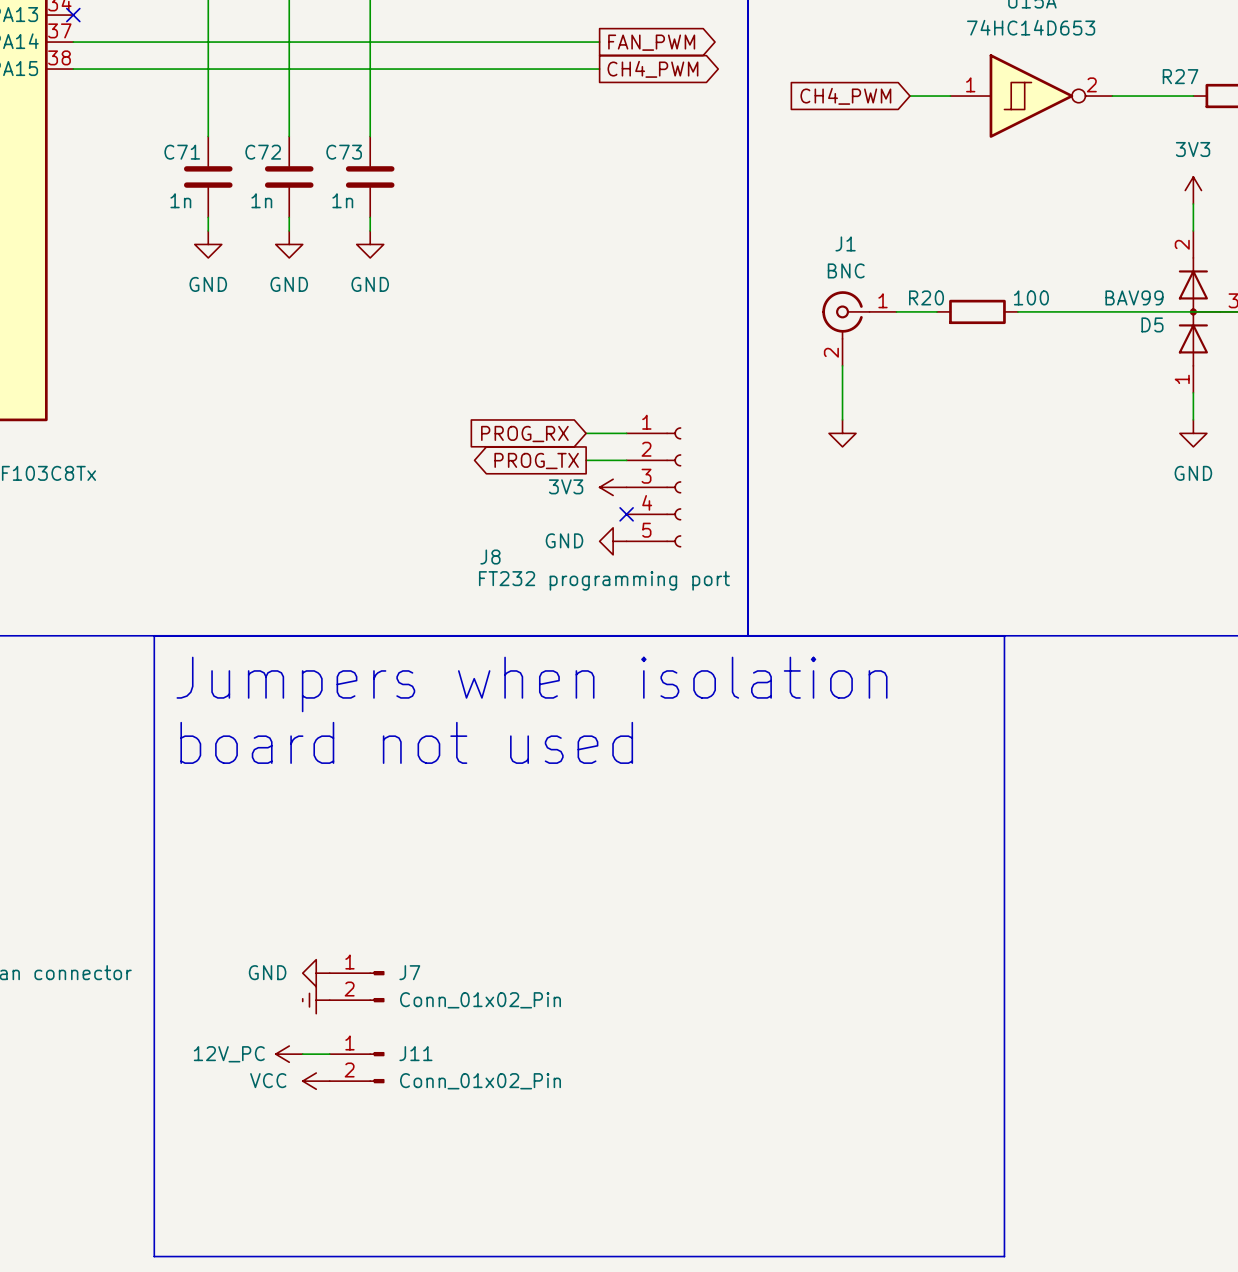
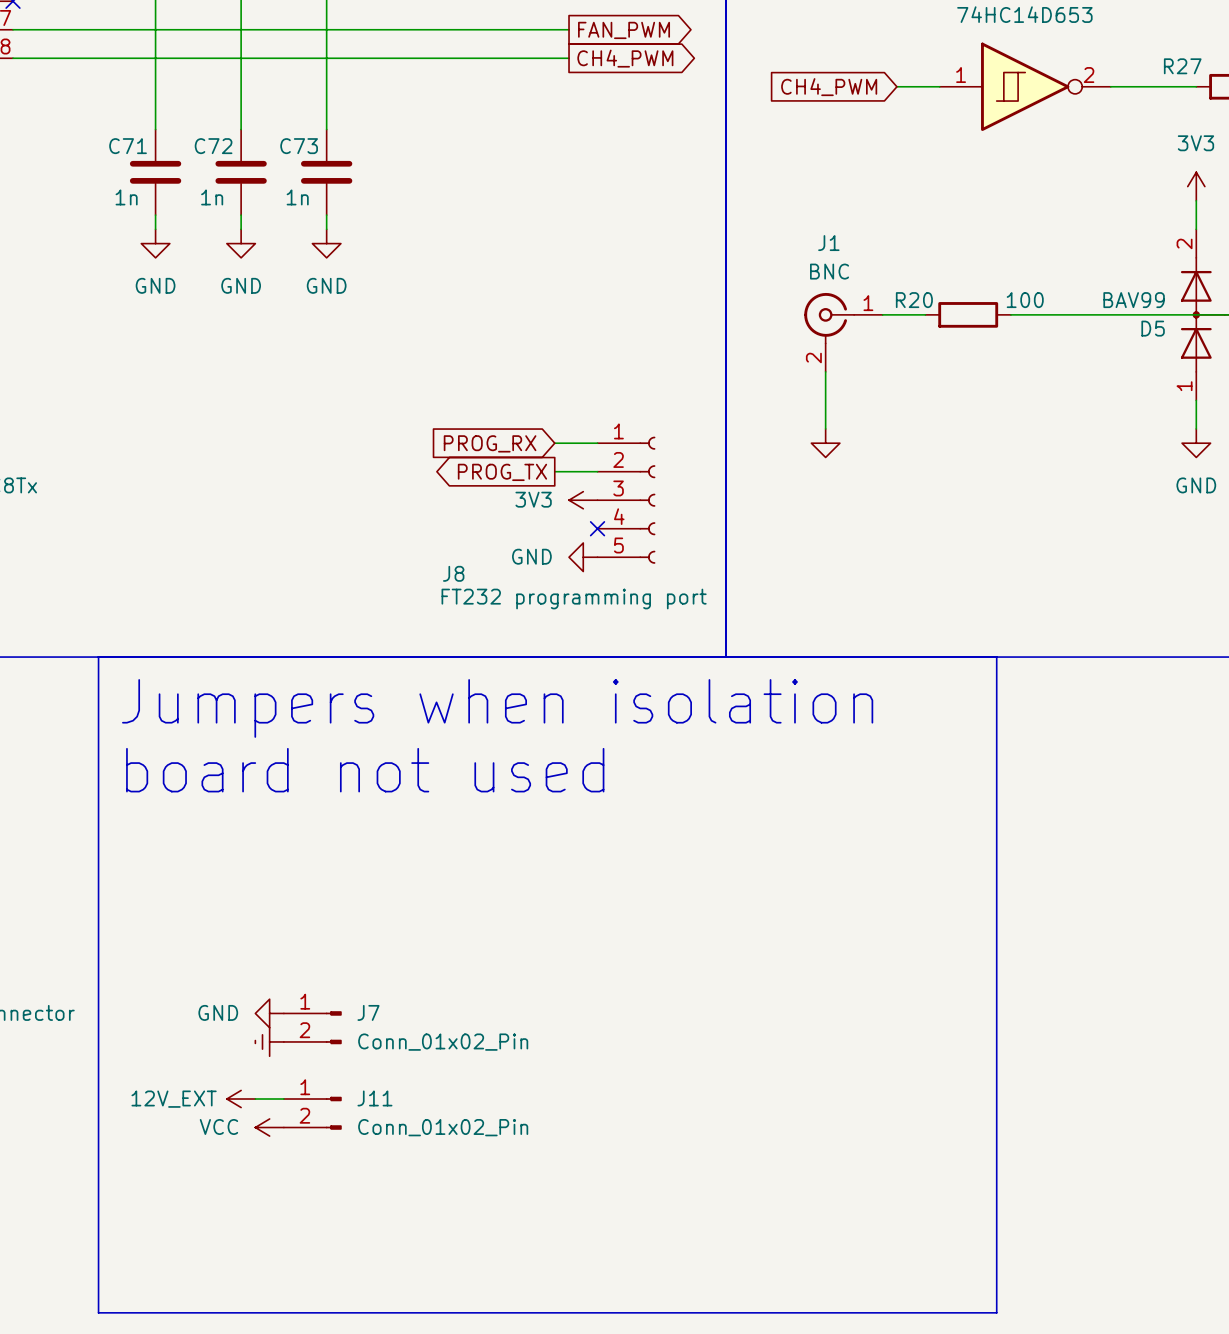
power symbol: 12V_PC (289, 1054) -> 12V_EXT (241, 1099)

